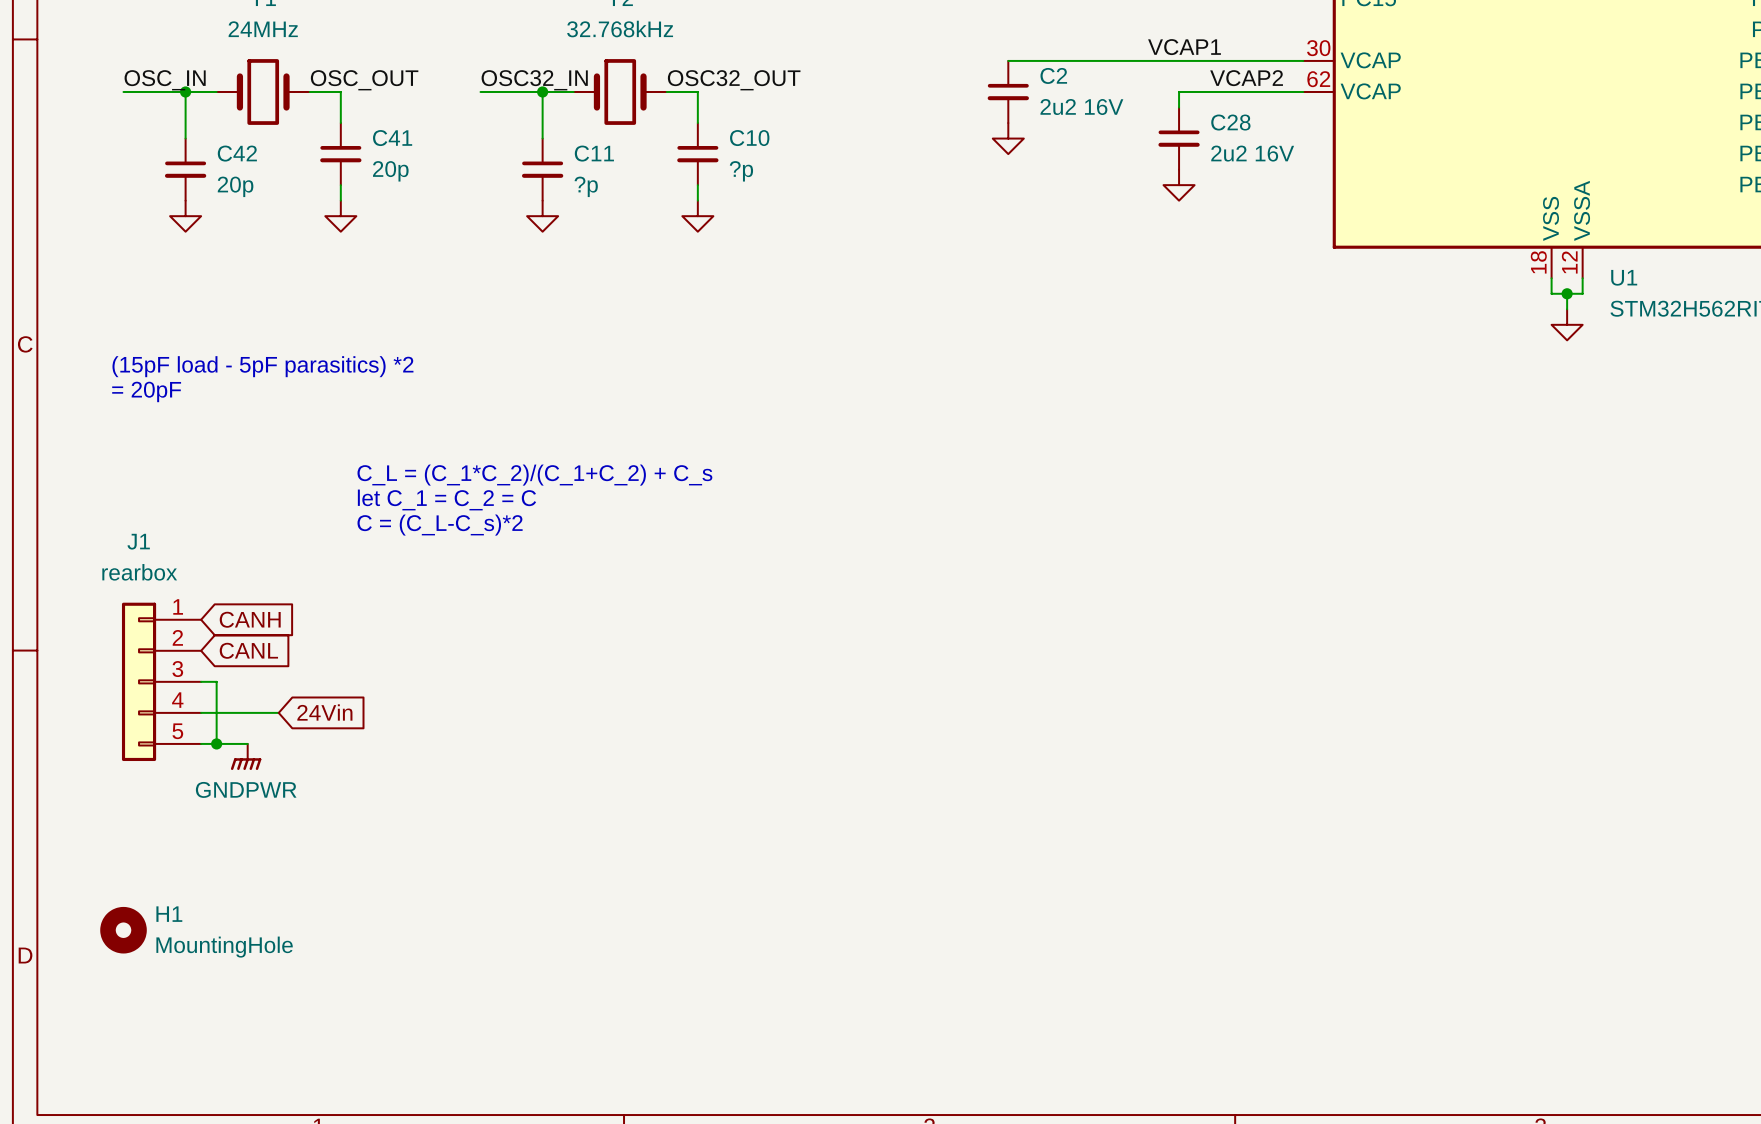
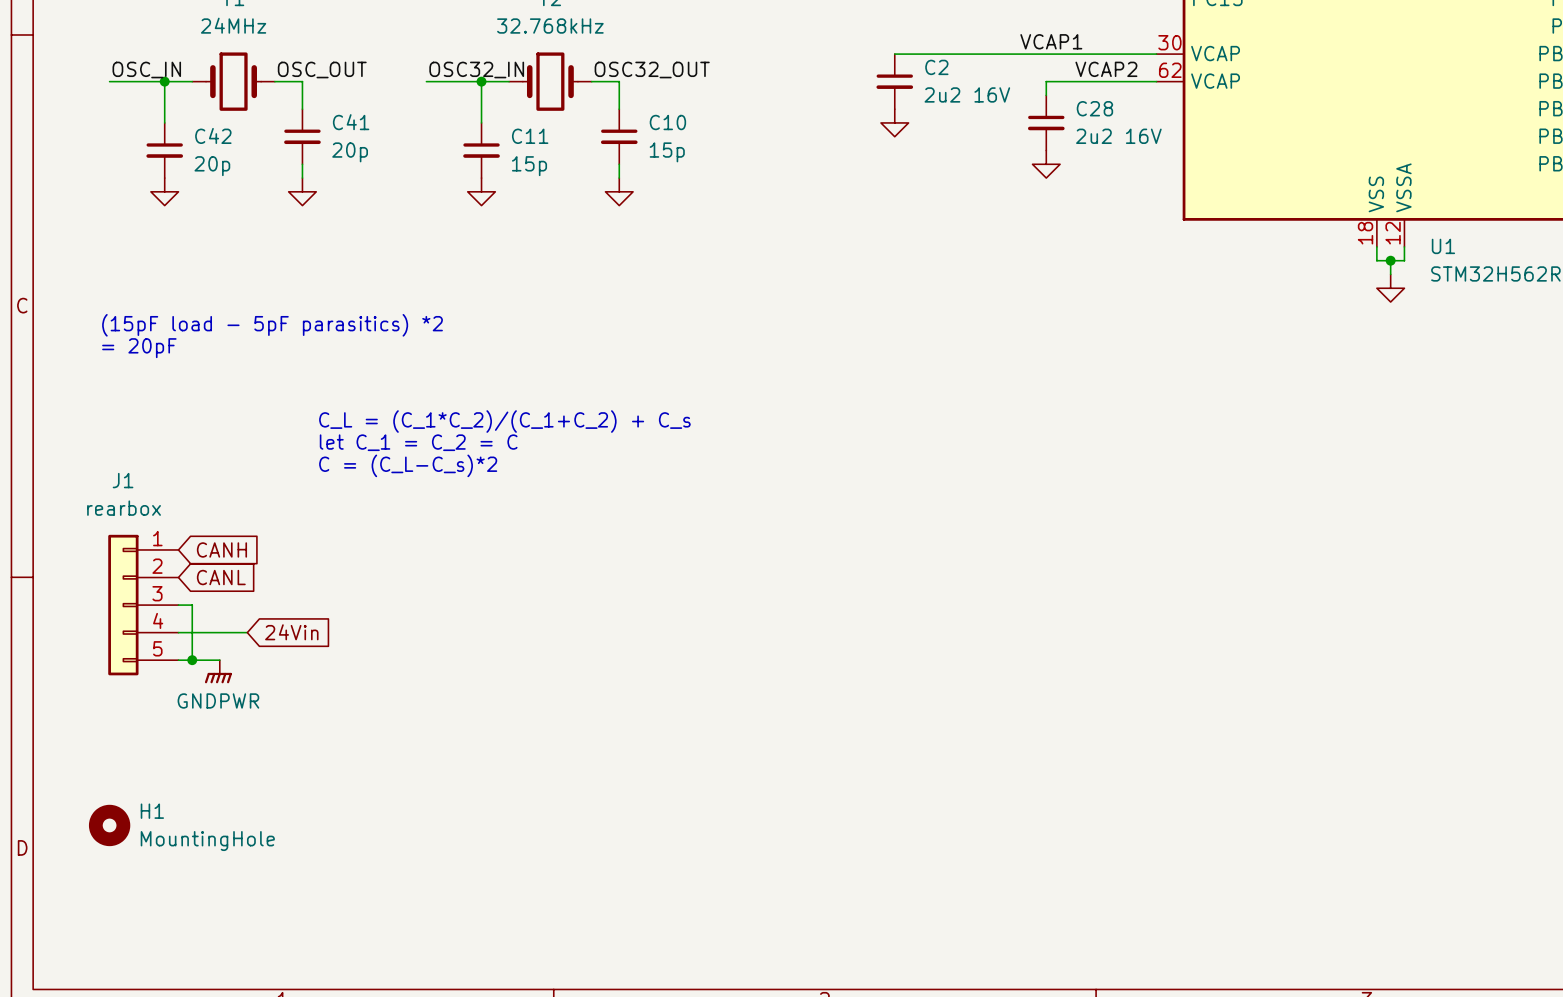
C10 value: ?p (741, 171) -> 15p (667, 152)
C11 value: ?p (586, 186) -> 15p (529, 166)

